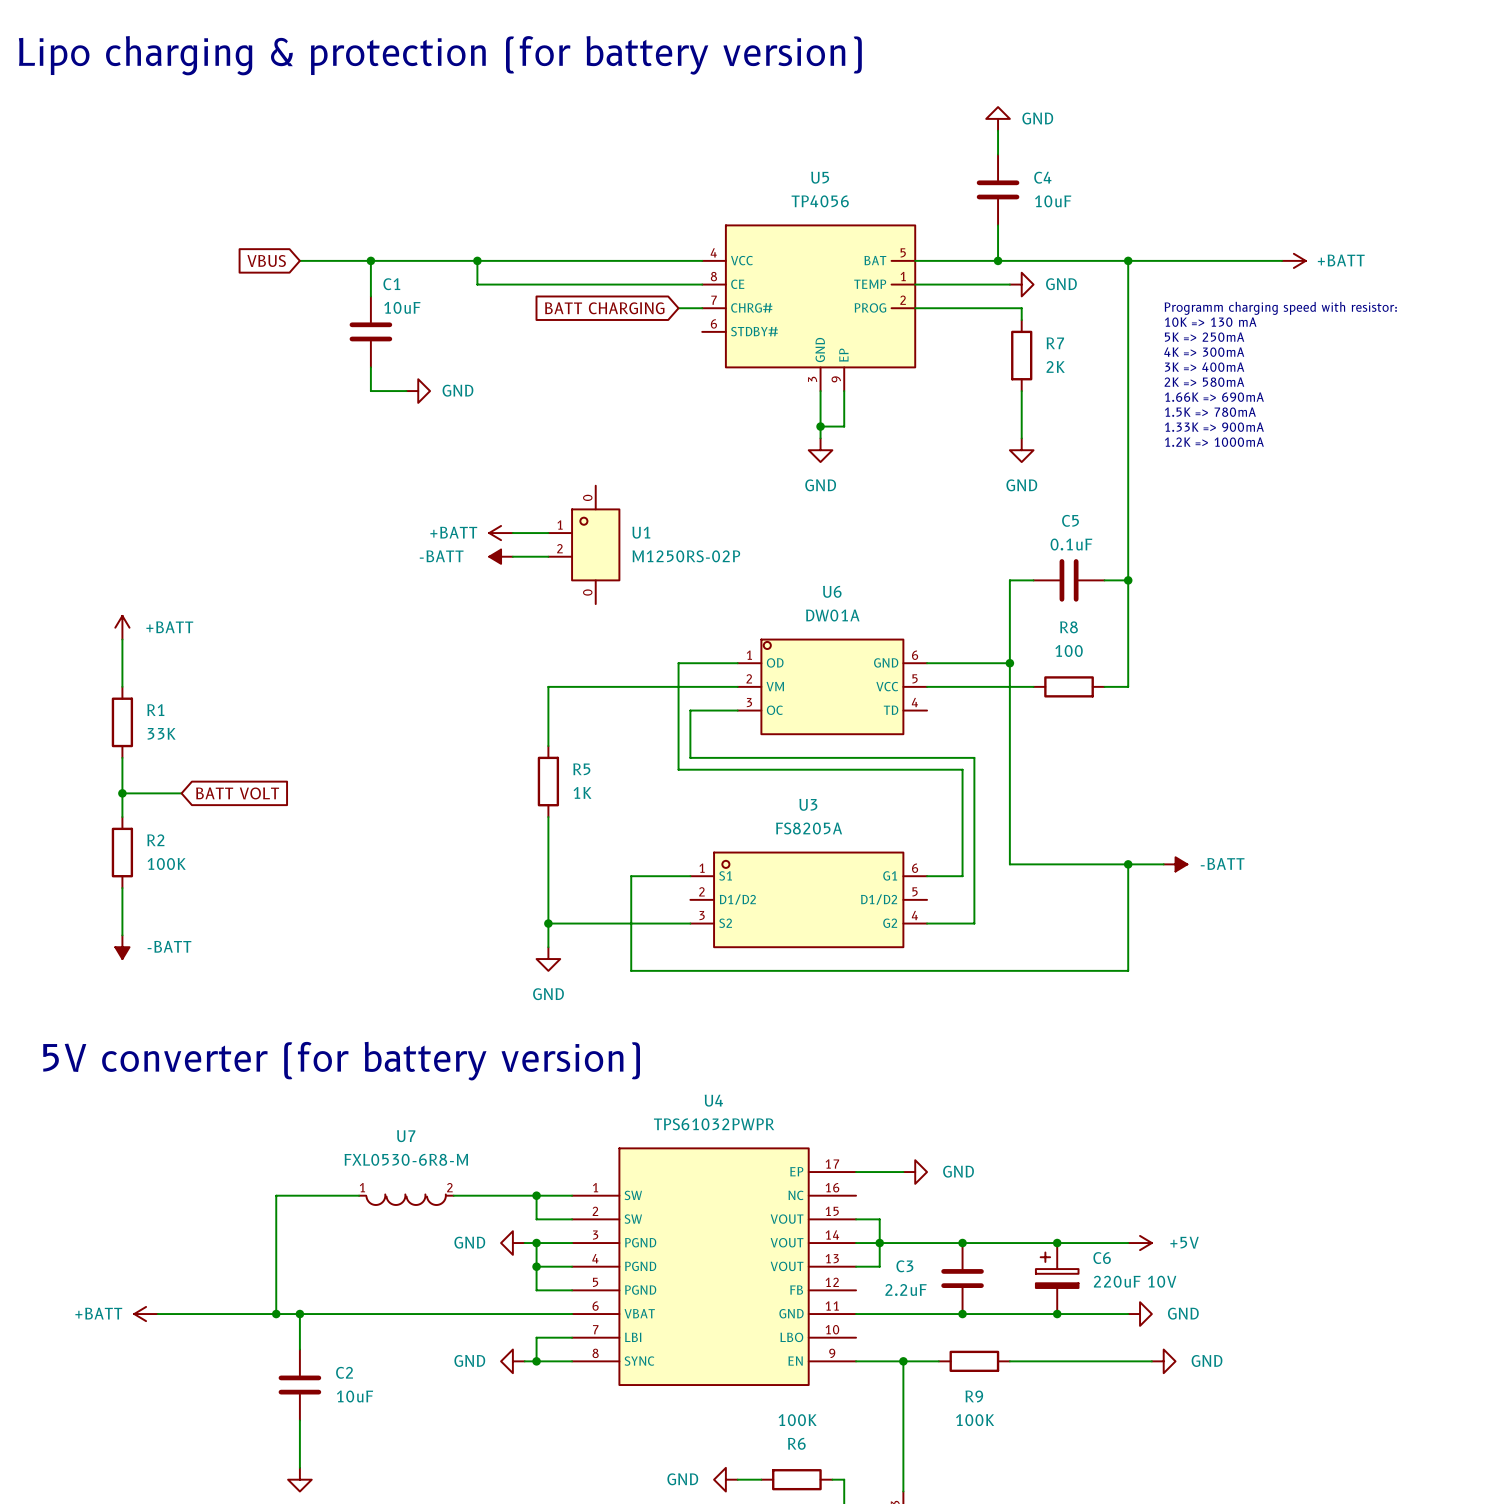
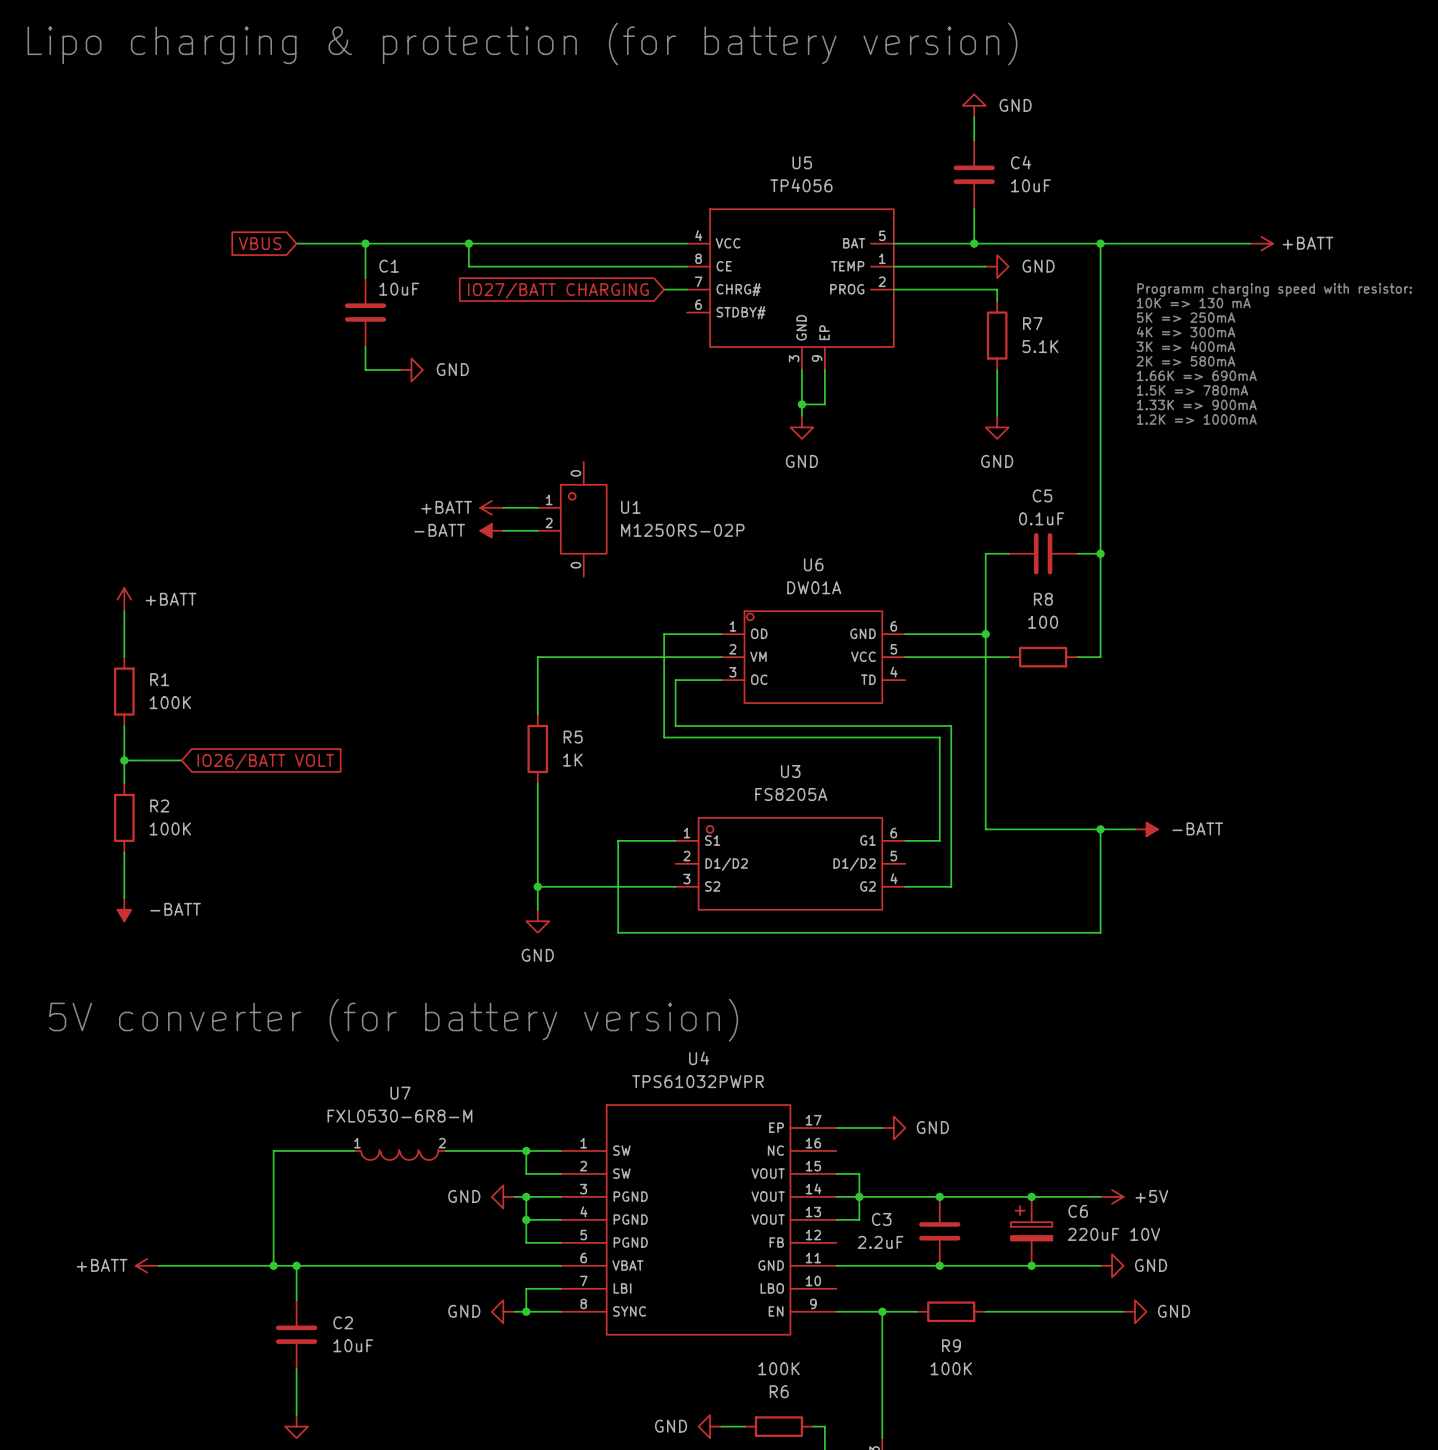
global label: BATT CHARGING (604, 308) -> IO27/BATT CHARGING (558, 290)
R7 value: 2K (1055, 366) -> 5.1K (1040, 346)
R1 value: 33K (161, 733) -> 100K (170, 702)
global label: BATT VOLT (237, 793) -> IO26/BATT VOLT (265, 761)

